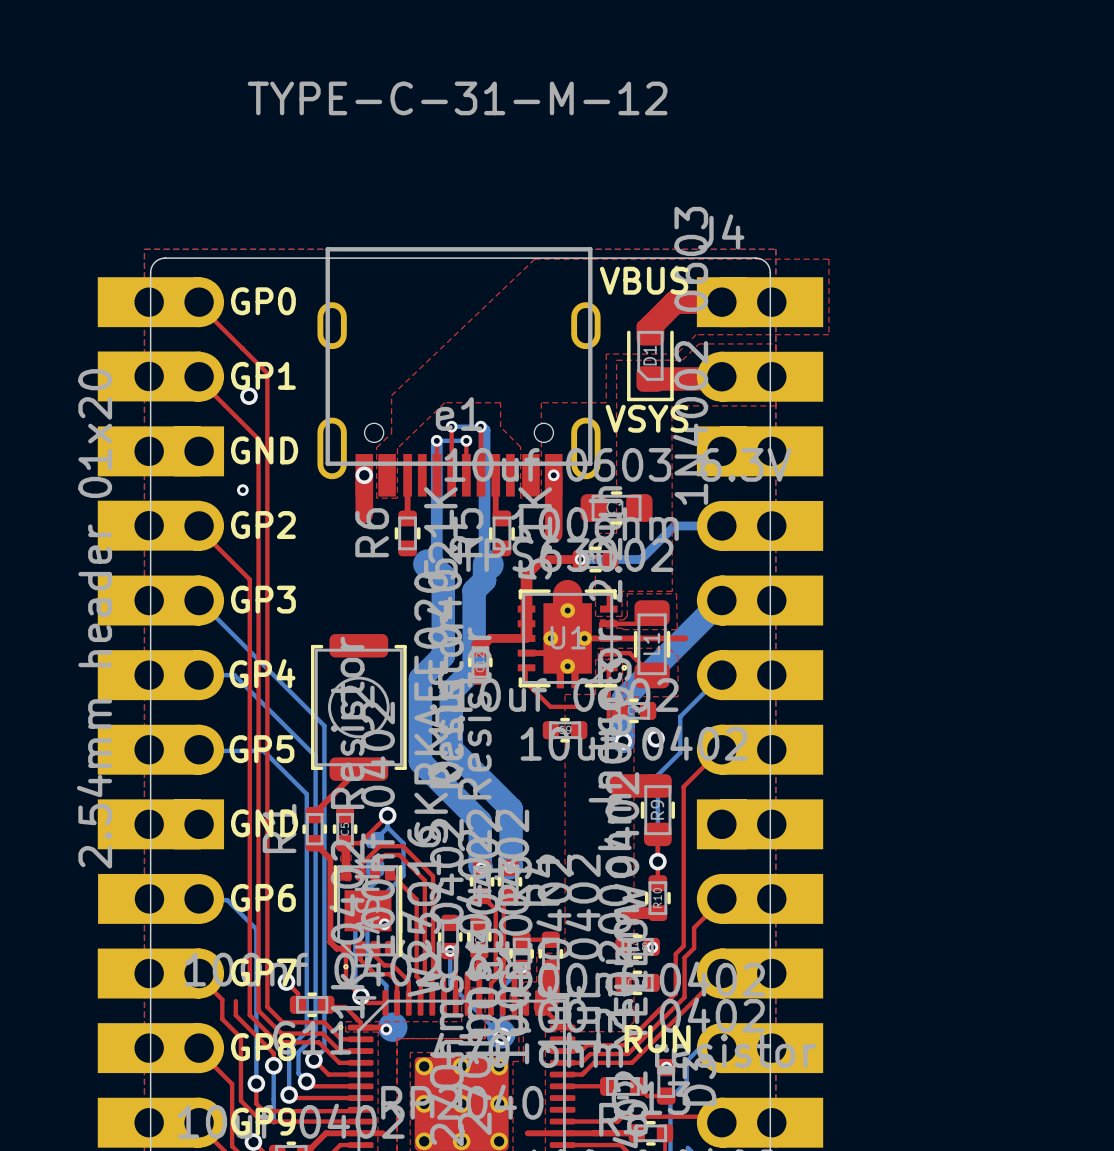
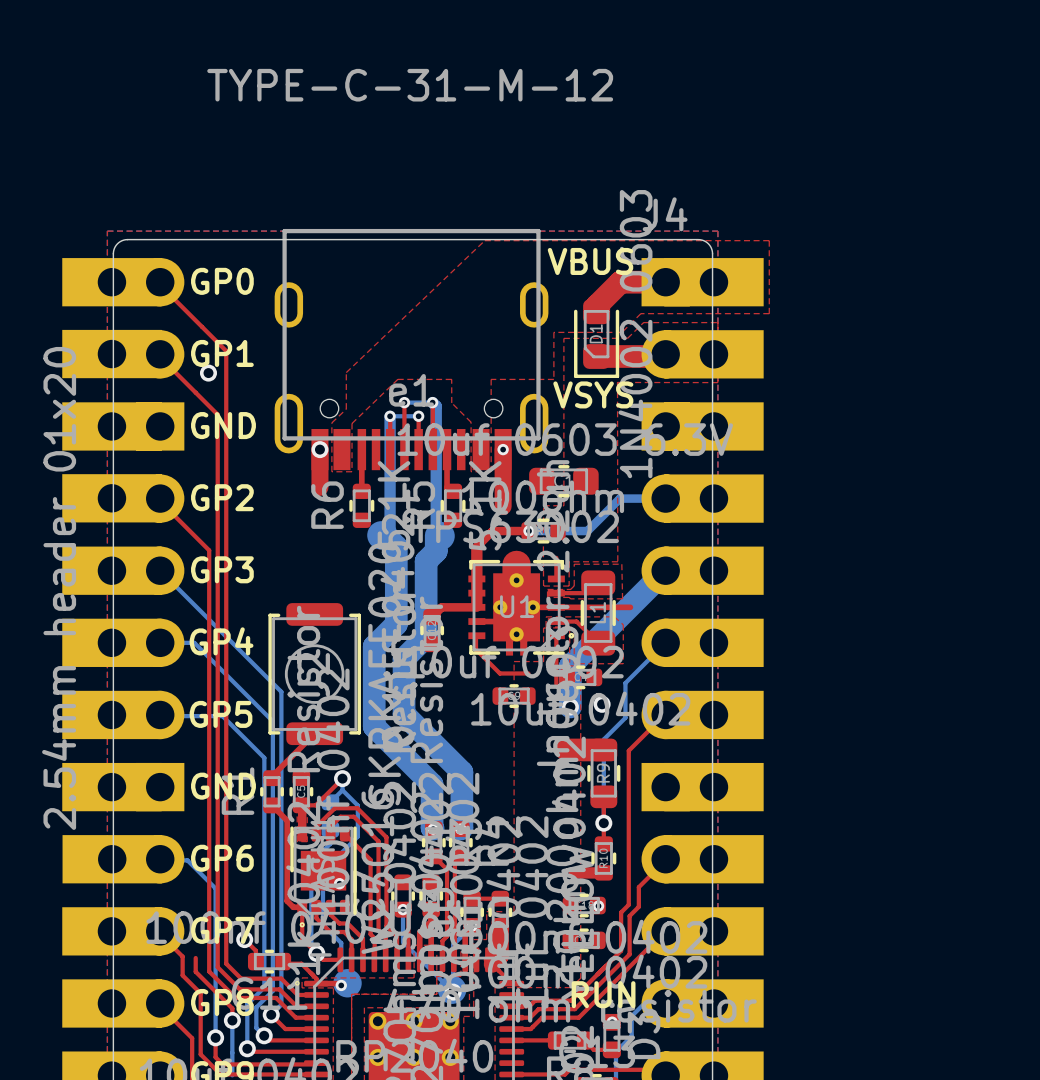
via: (242, 490) -> none

